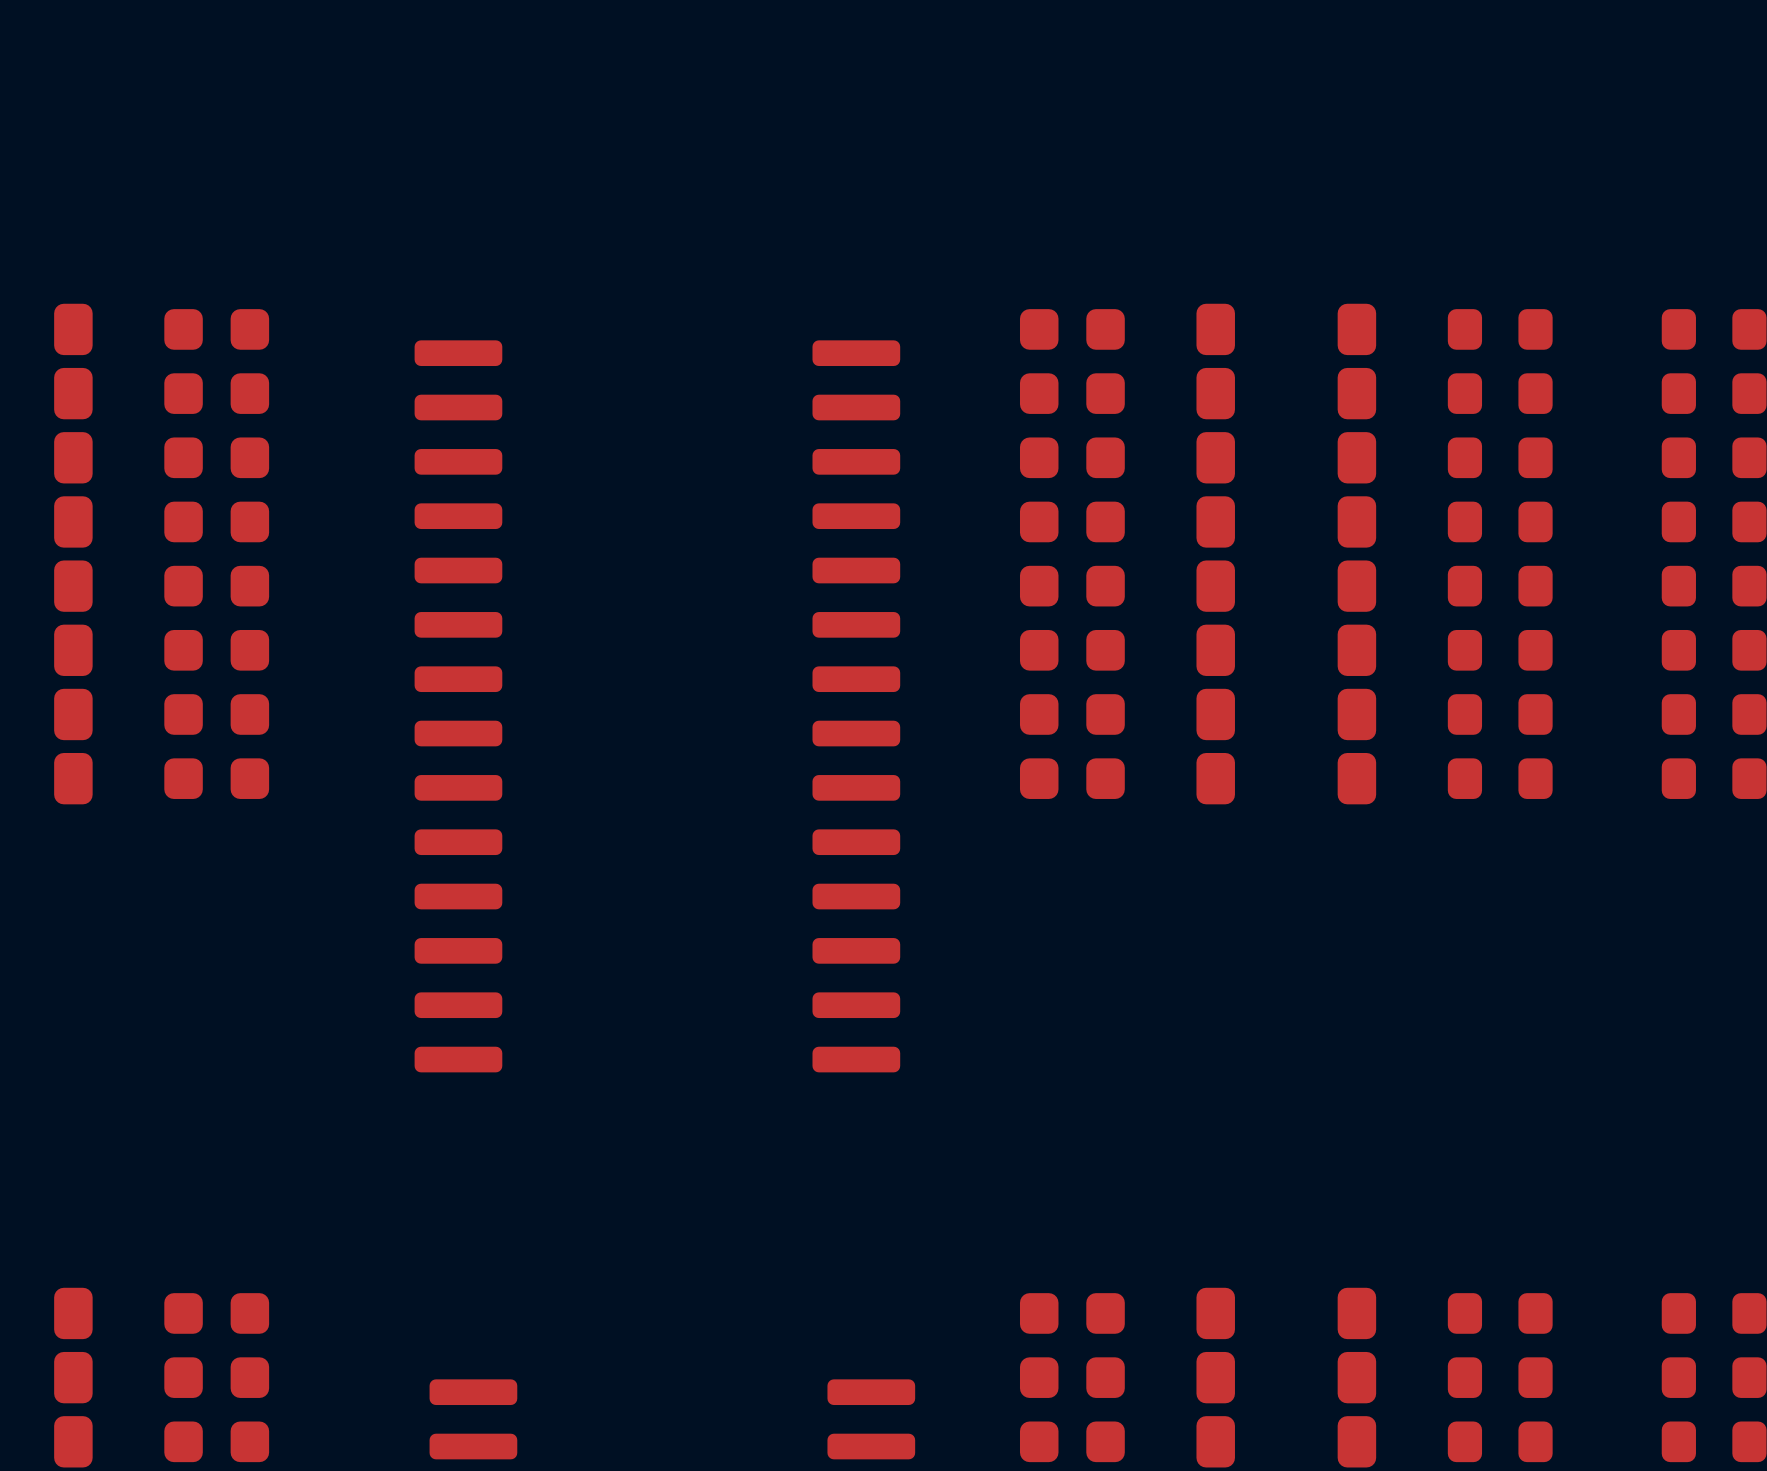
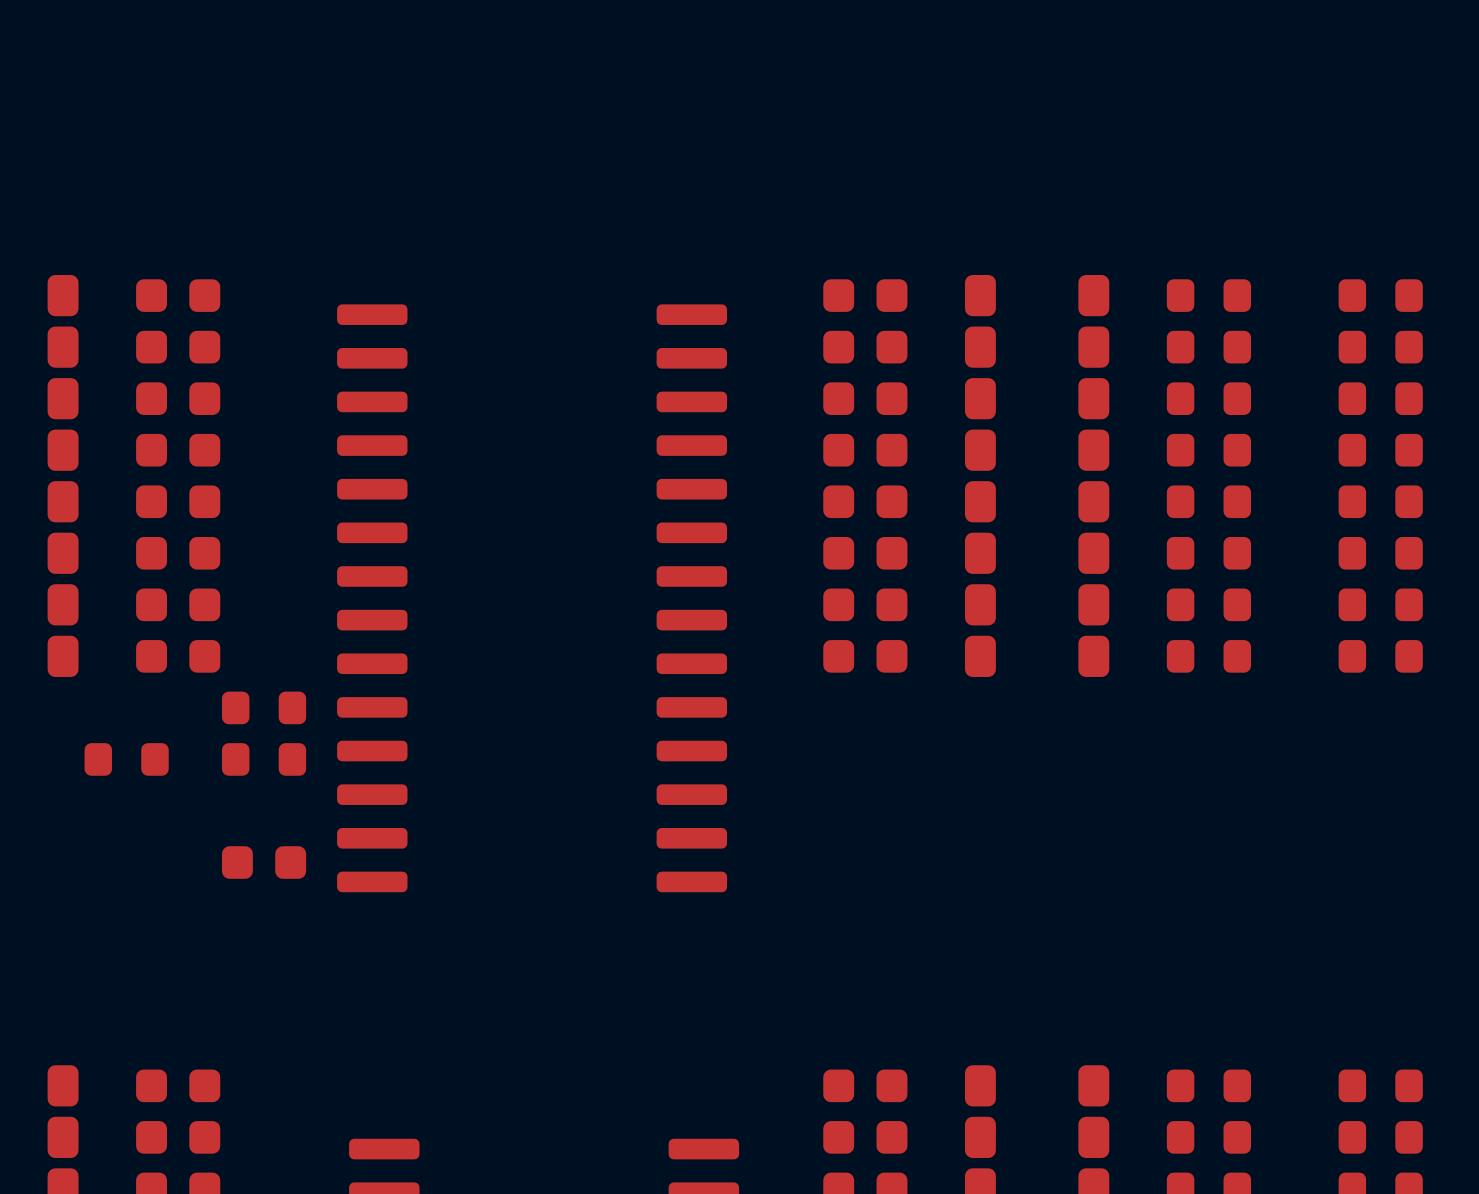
part: none -> (264, 707)
part: none -> (126, 759)
part: none -> (264, 759)
part: none -> (264, 862)

